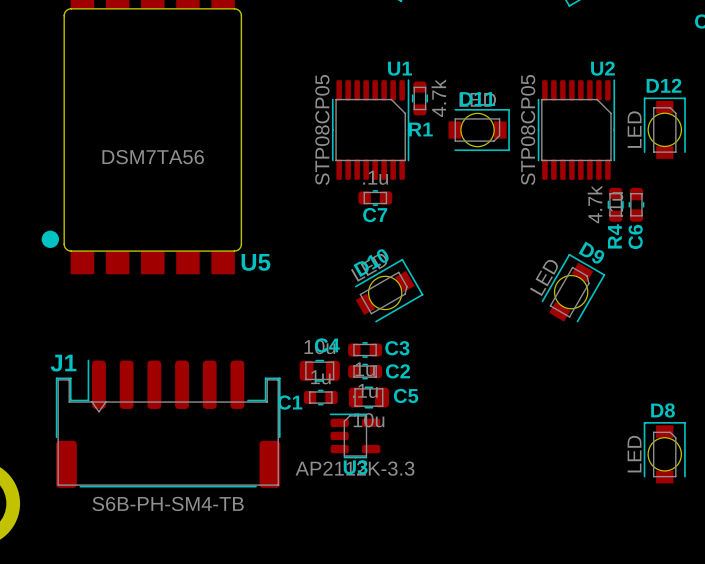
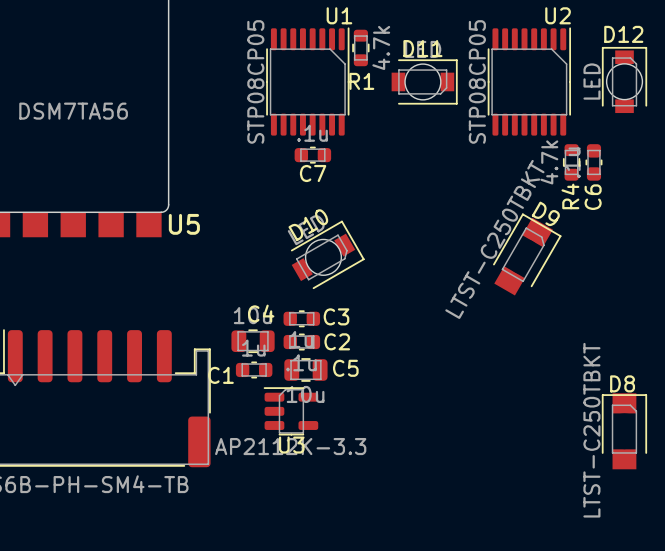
D9 footprint: [541, 253, 606, 323] -> [493, 213, 562, 296]
D9 value: LED (543, 277) -> LTST-C250TBKT (494, 239)
D8 footprint: [643, 422, 686, 484] -> [601, 393, 648, 470]
D8 value: LED (634, 454) -> LTST-C250TBKT (591, 430)

